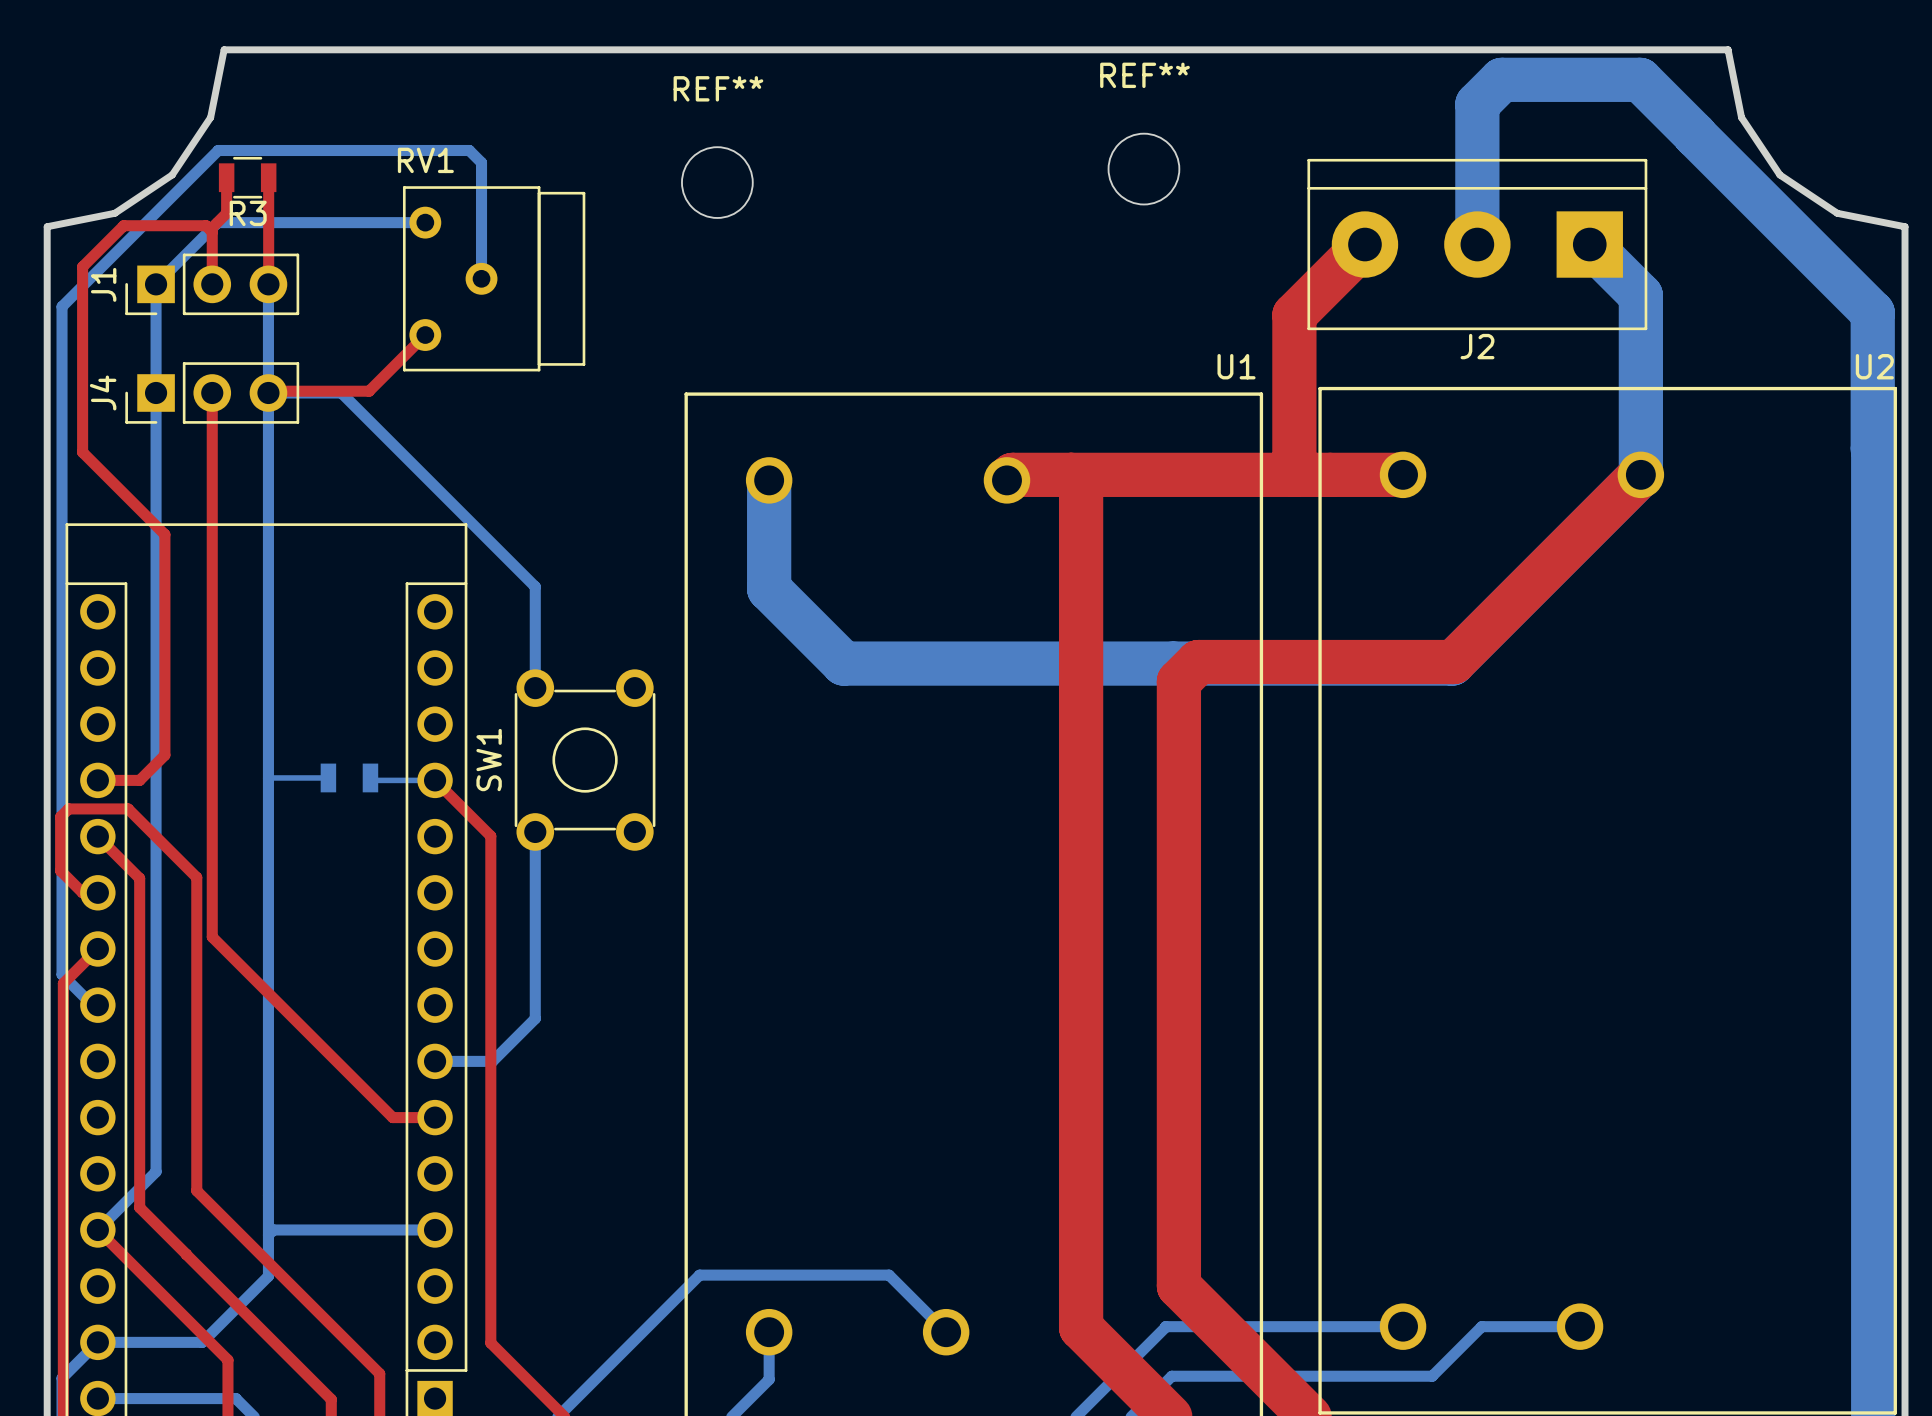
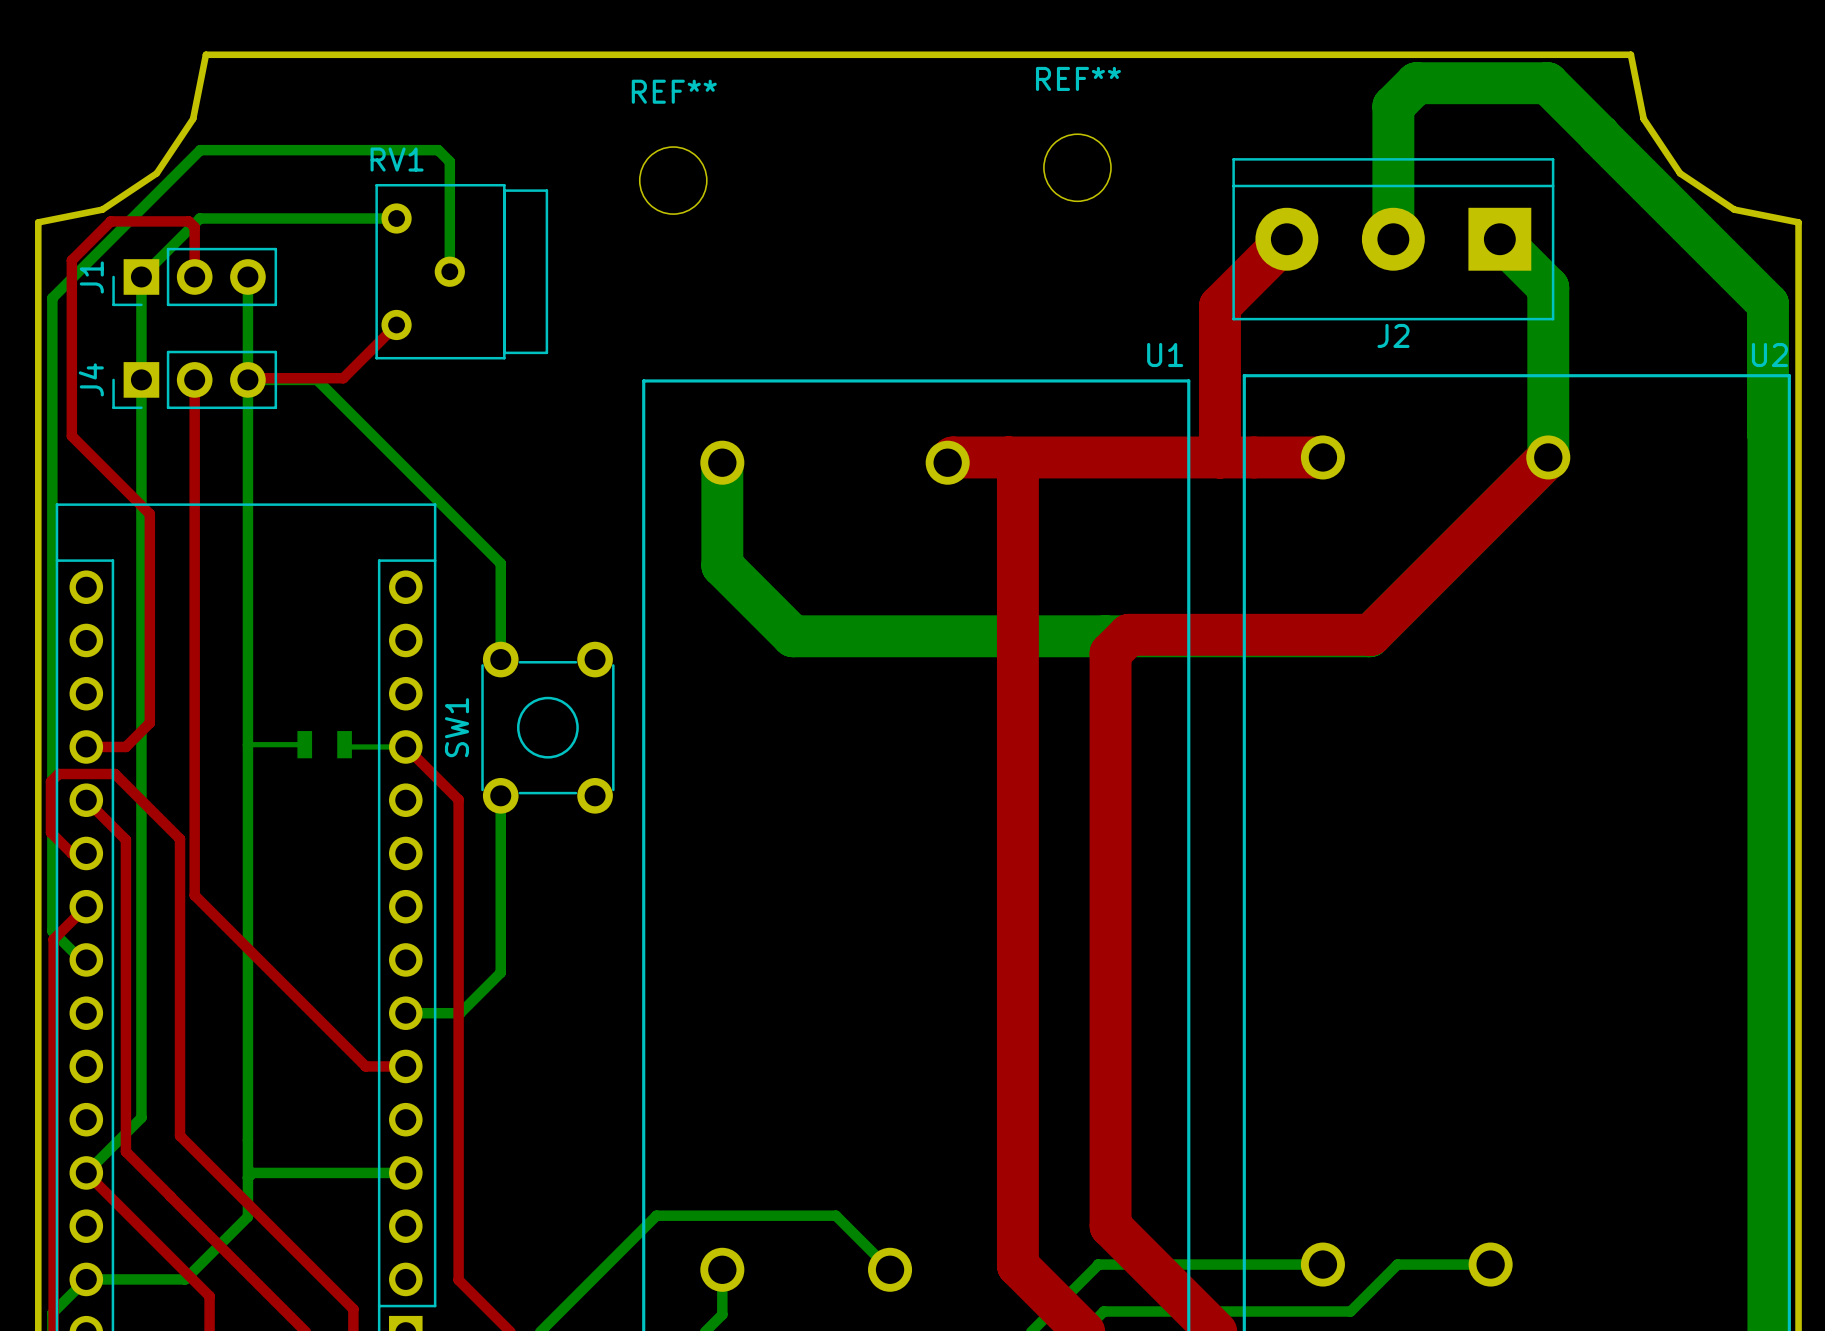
top track: (226, 177) (226, 213) (210, 229) -> none
R3: (247, 177) -> none
top track: (268, 177) (268, 284) -> none

